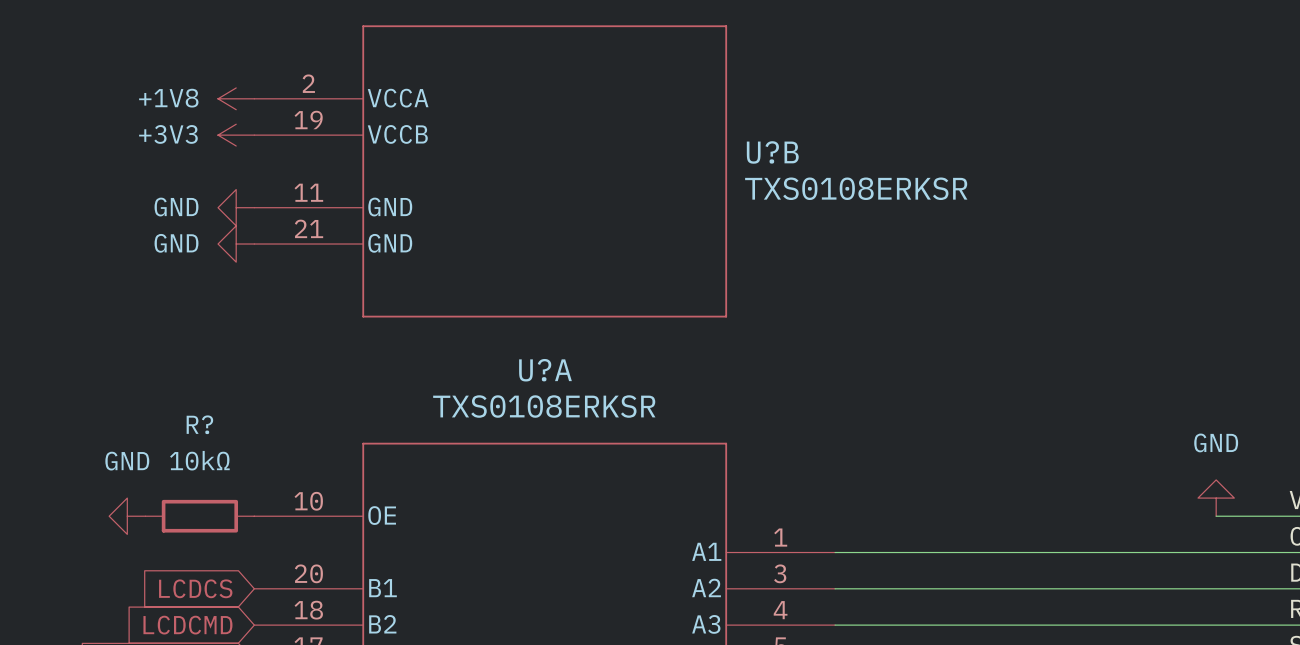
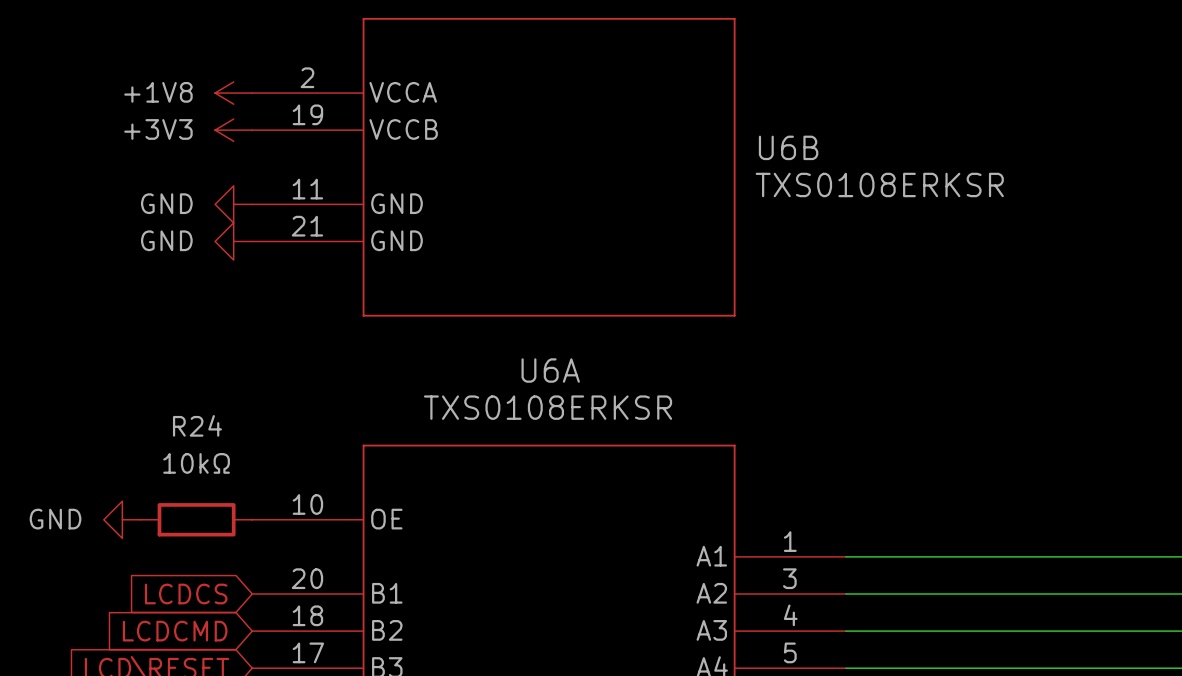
U?B name: U?B (772, 152) -> U6B (788, 147)
U?A name: U?A (545, 370) -> U6A (550, 370)
R? name: R? (199, 424) -> R24 (197, 425)
power symbol text position: GND (127, 461) -> GND (55, 519)

